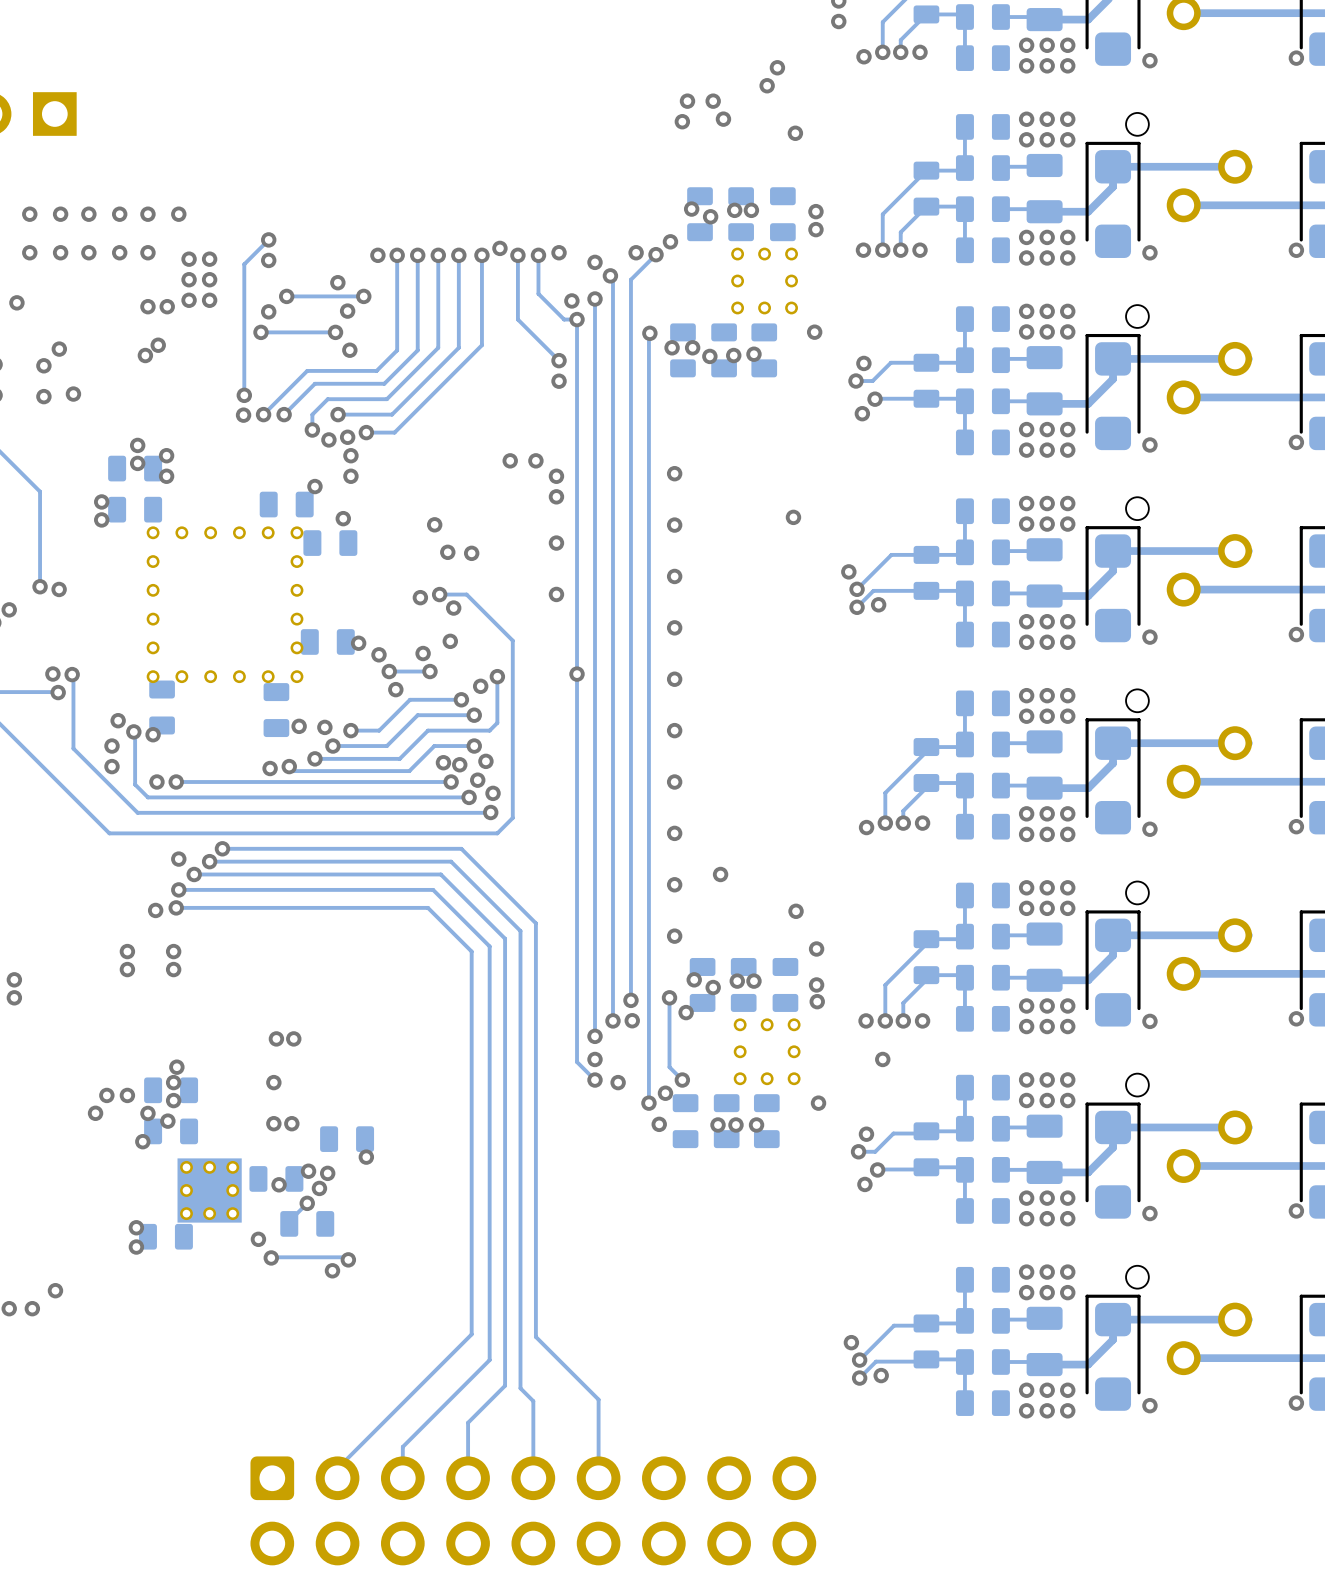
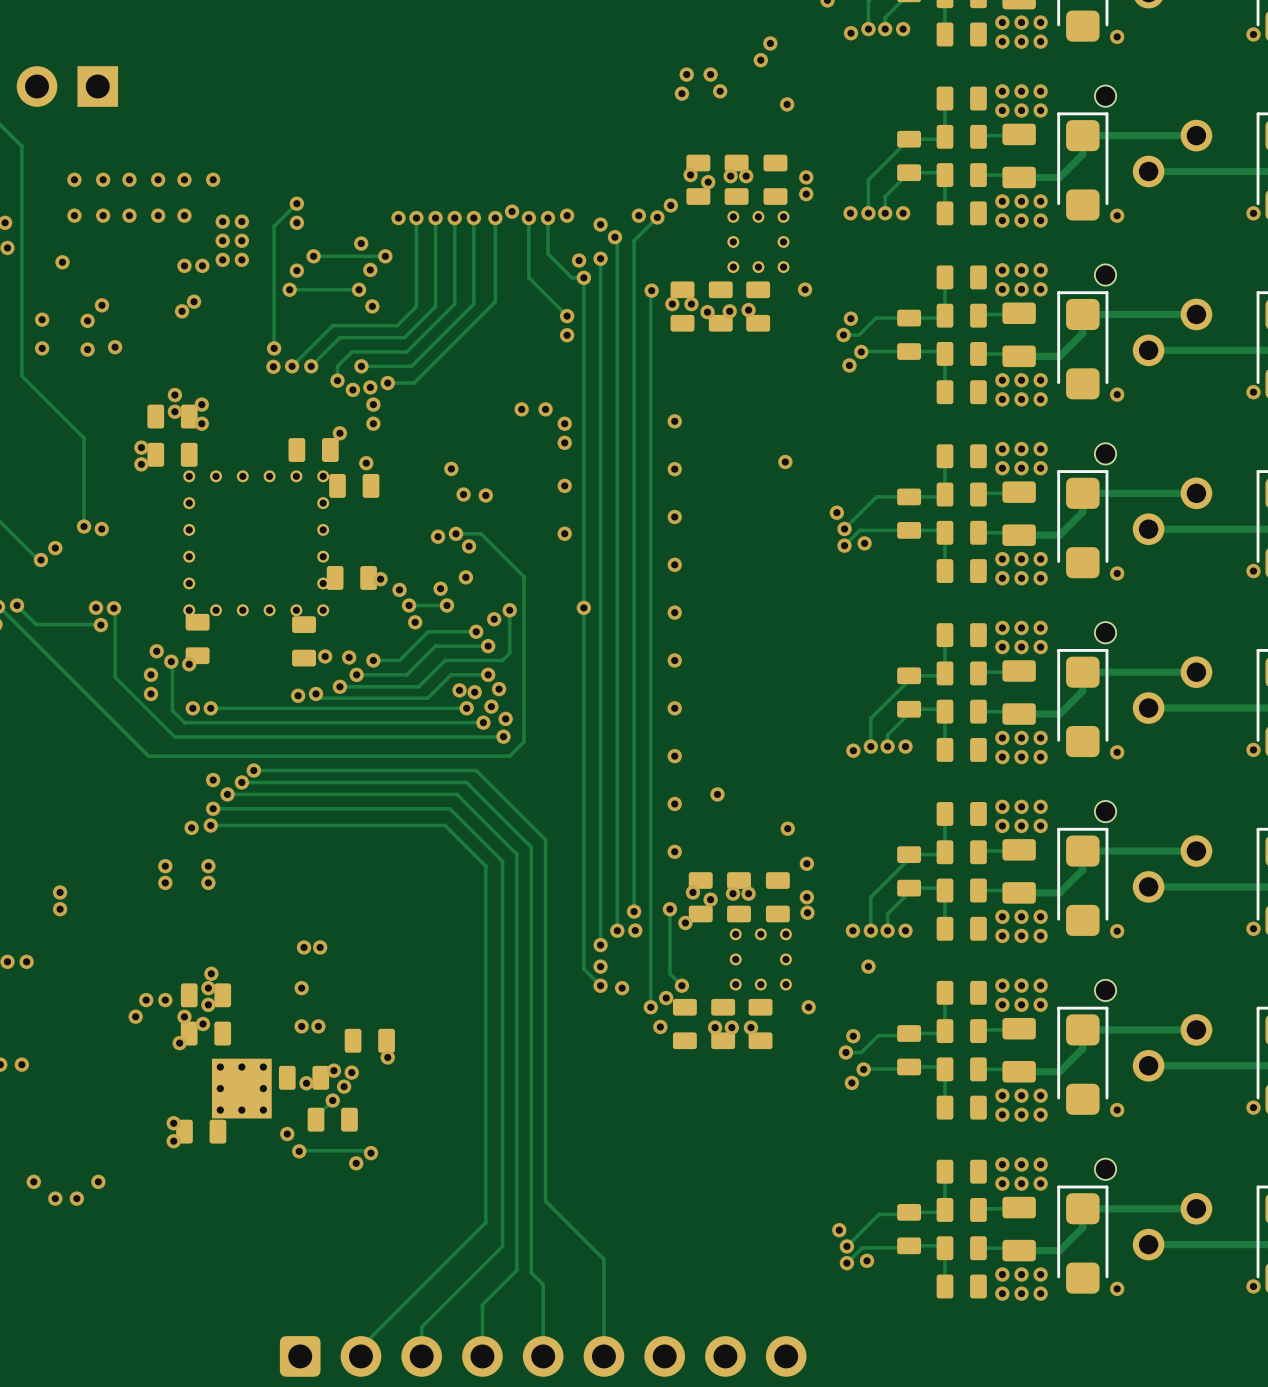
track: (535, 1311) (535, 1336) (598, 1399) -> (545, 1200) (603, 1259) (603, 1283)

